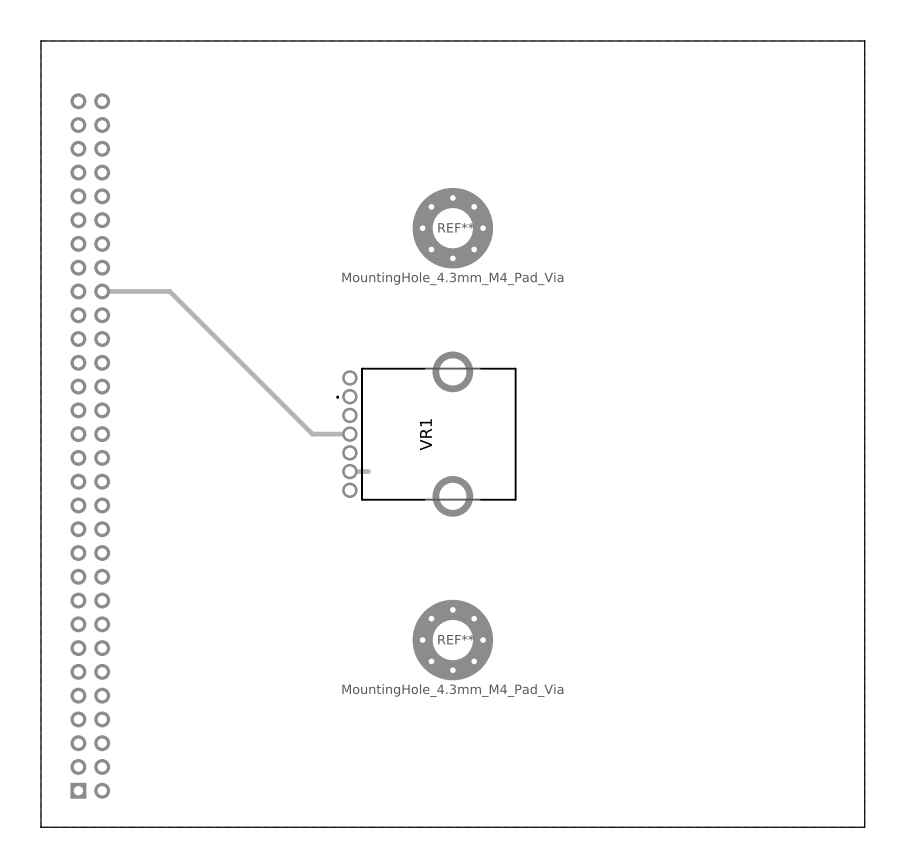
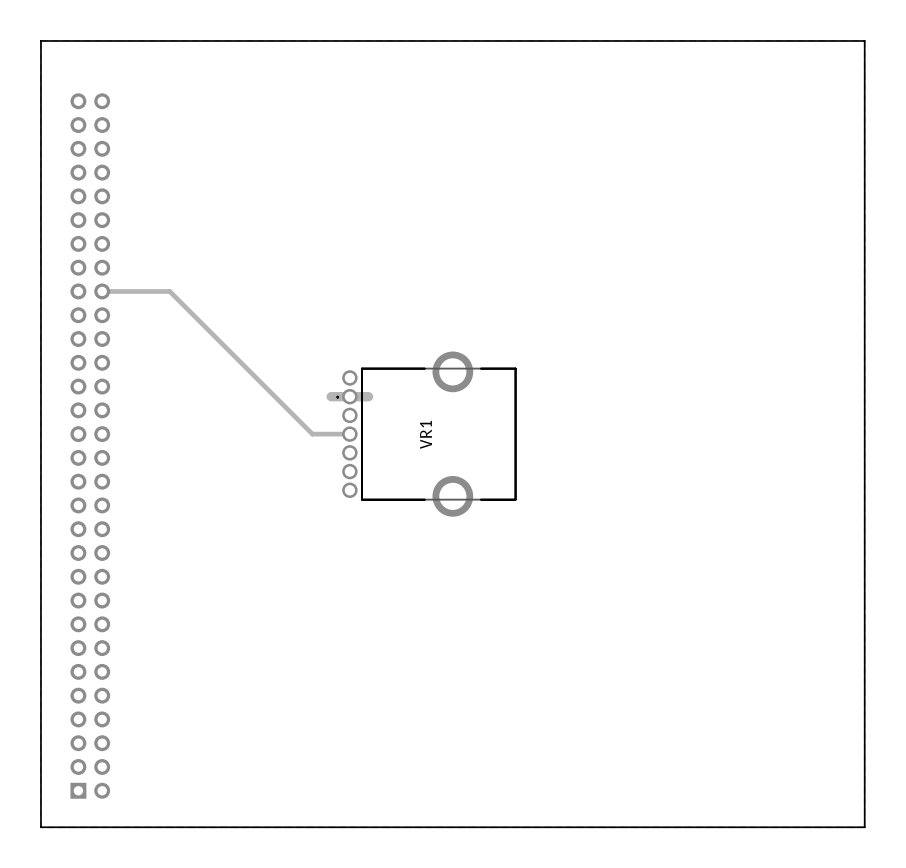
REF**: MountingHole_4.3mm_M4_Pad_Via (452, 228) -> none
track: none -> (331, 396) (368, 396)
track: (349, 471) (368, 471) -> none
REF**: MountingHole_4.3mm_M4_Pad_Via (452, 640) -> none

